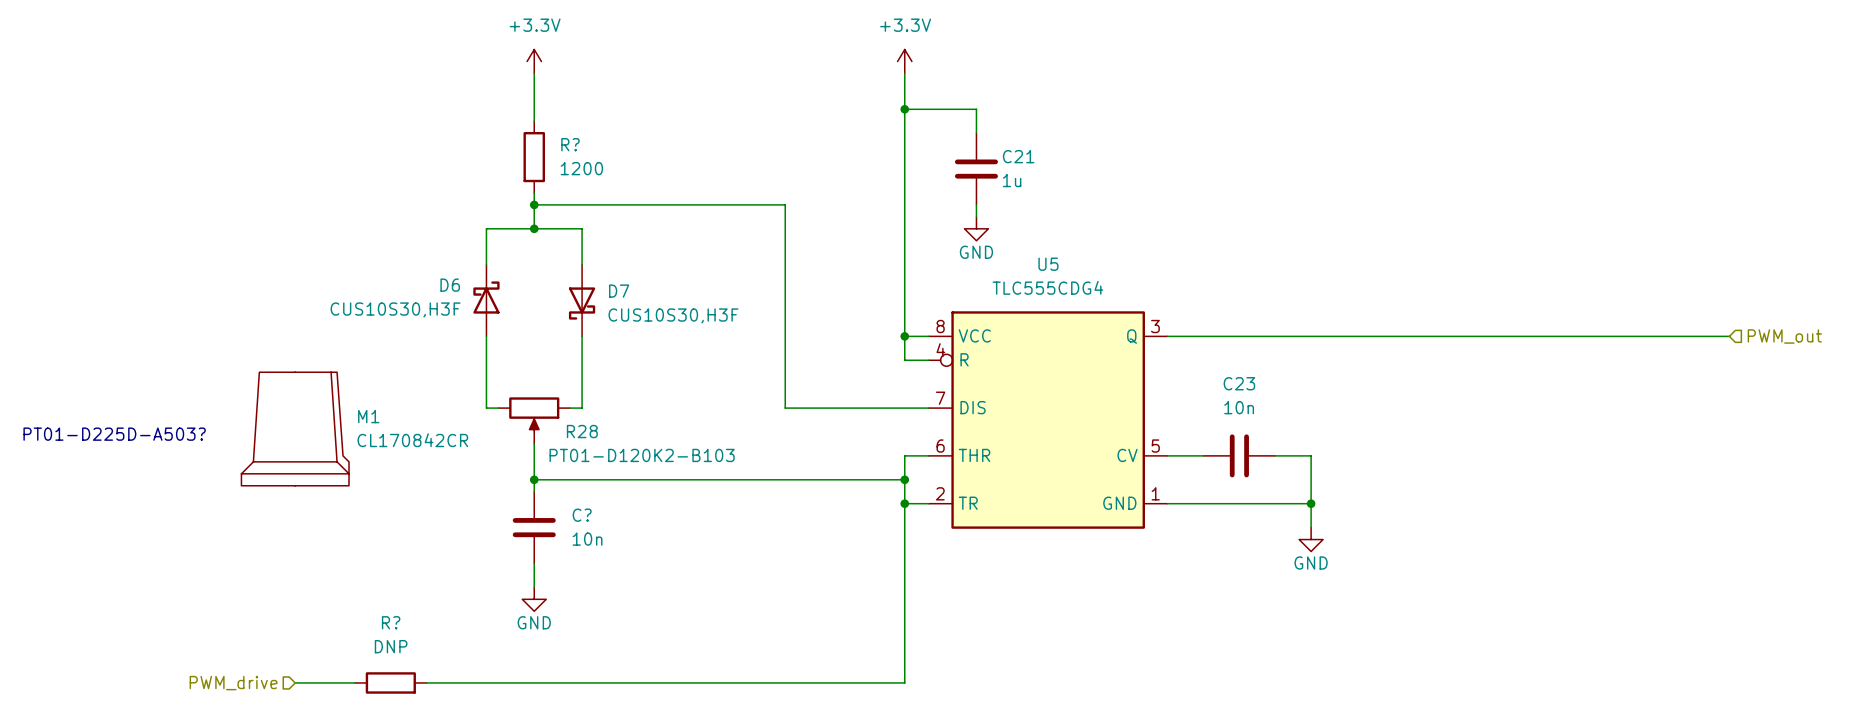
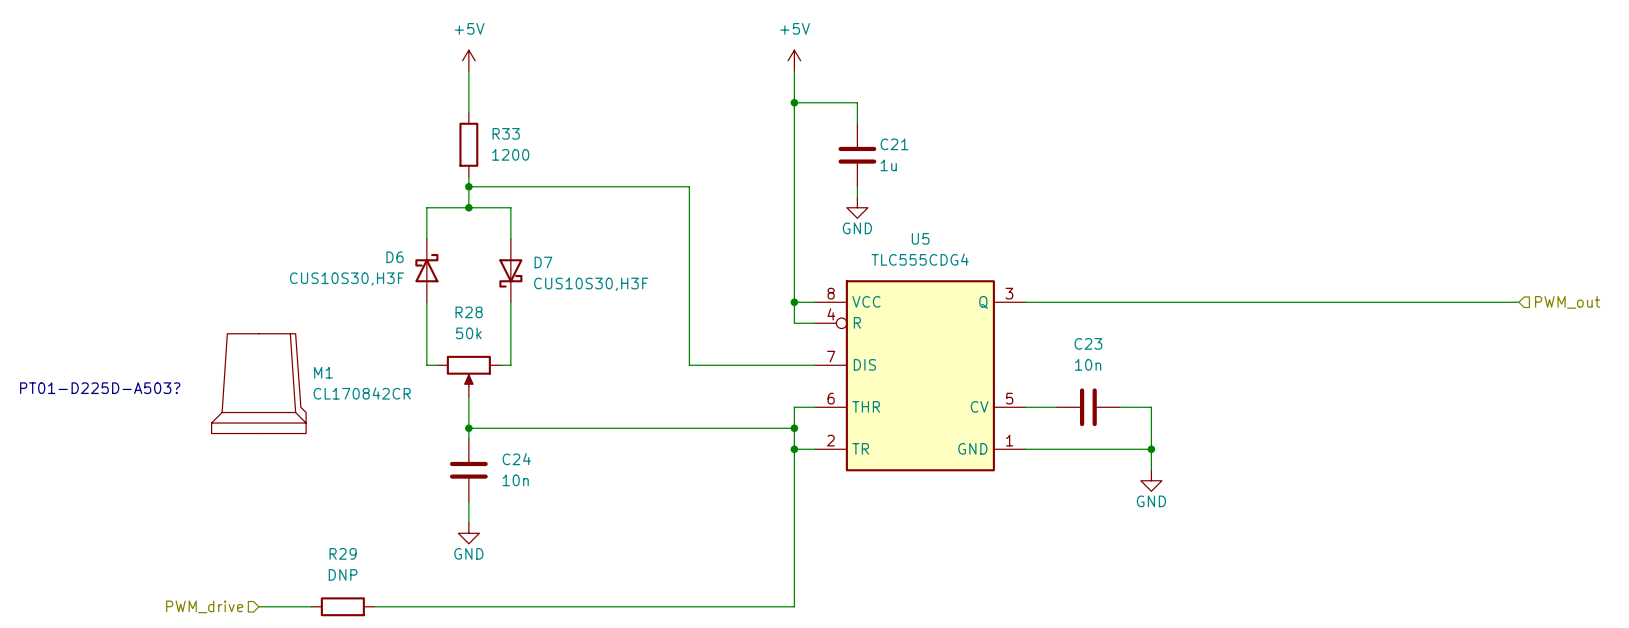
power symbol: +3.3V (534, 61) -> +5V (468, 60)
power symbol: +3.3V (904, 61) -> +5V (794, 60)
R? name: R? (570, 144) -> R33 (506, 133)
U5 symbol: [928, 311, 1168, 529] -> [815, 280, 1026, 472]
R28 name position: R28 (582, 431) -> R28 (469, 312)
R28 text: PT01-D120K2-B103 (642, 455) -> 50k (468, 333)
C? name: C? (582, 515) -> C24 (516, 459)
R? name: R? (391, 622) -> R29 (343, 553)

